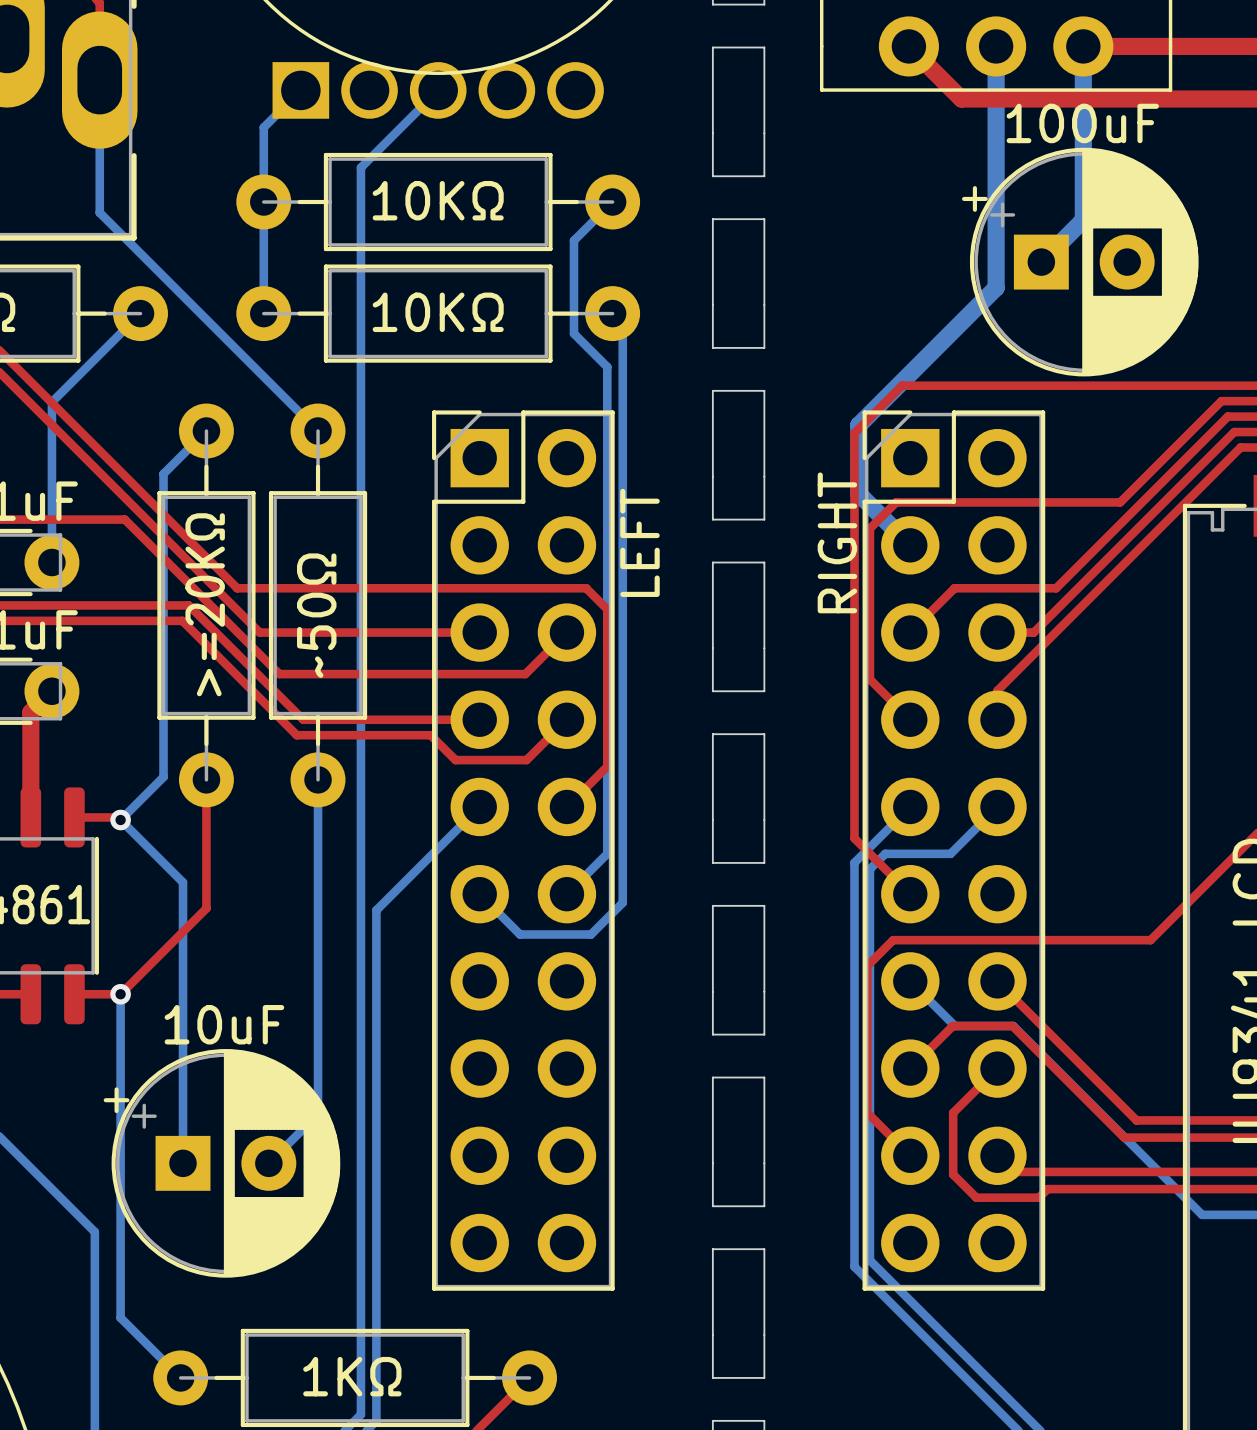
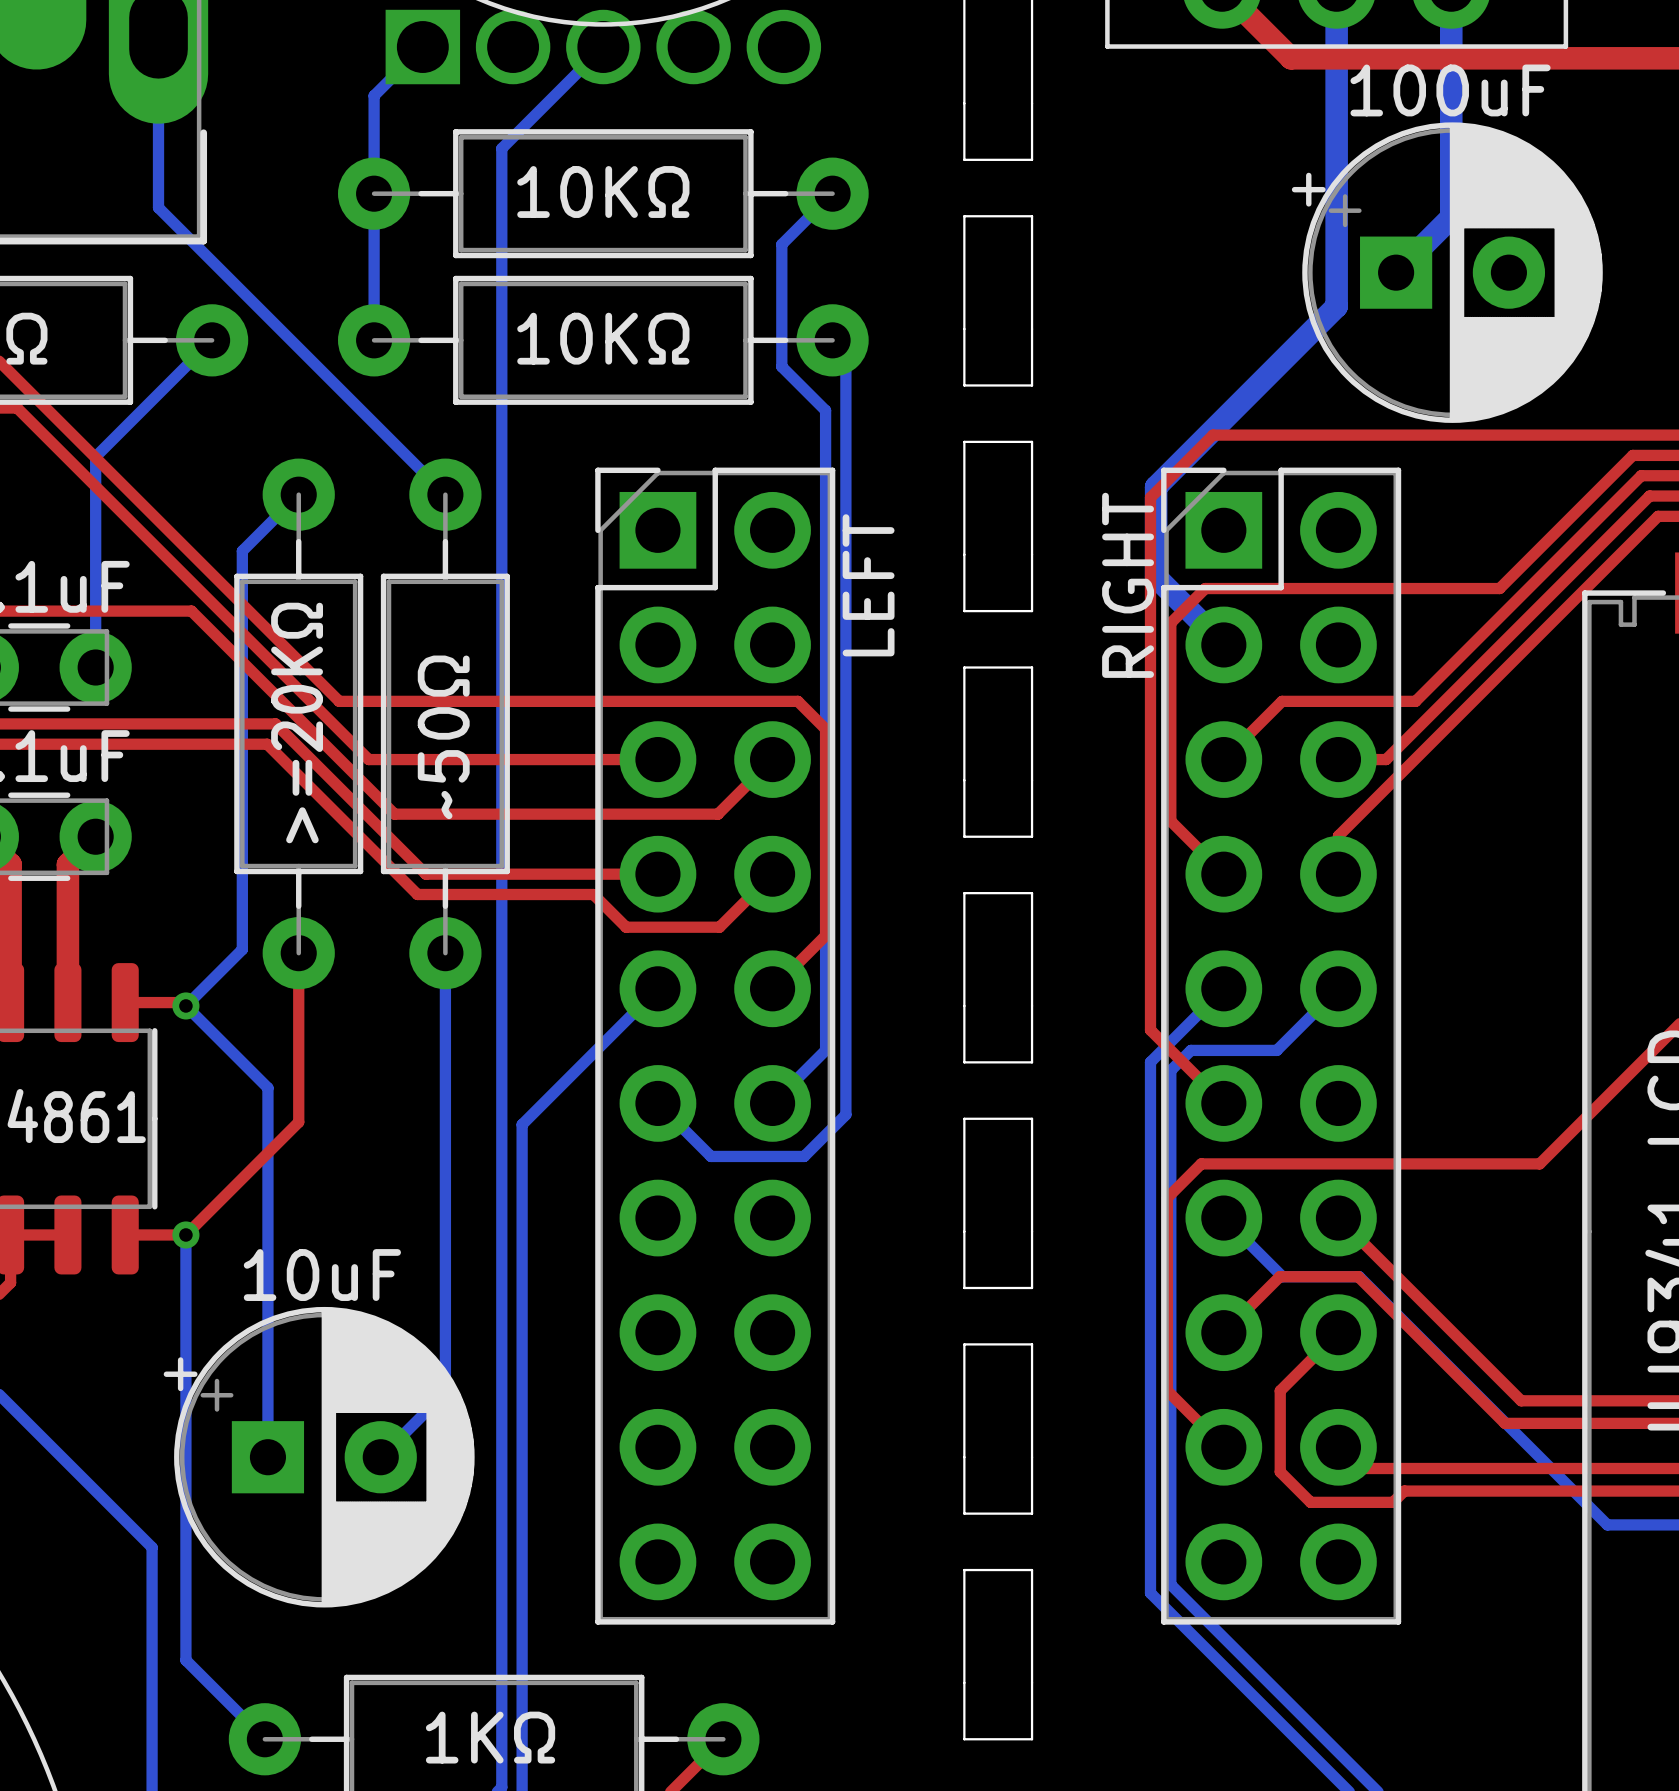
text position: LEFT (639, 542) -> LEFT (868, 585)
text position: RIGHT (837, 542) -> RIGHT (1128, 585)

